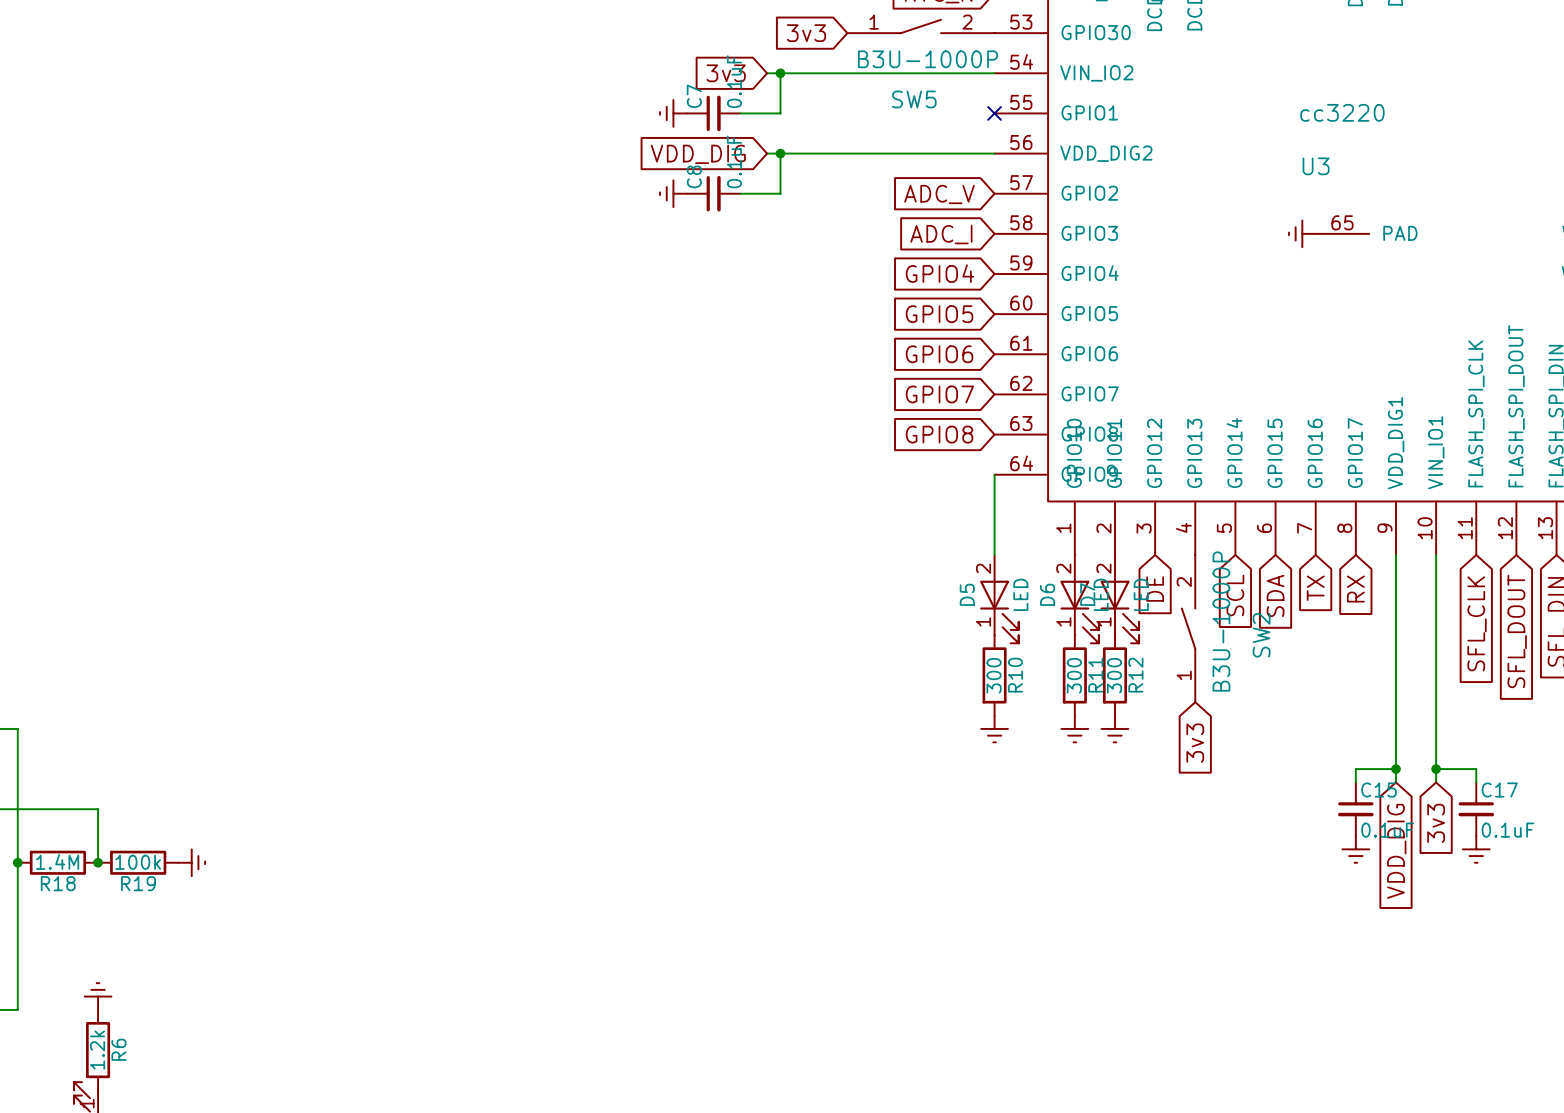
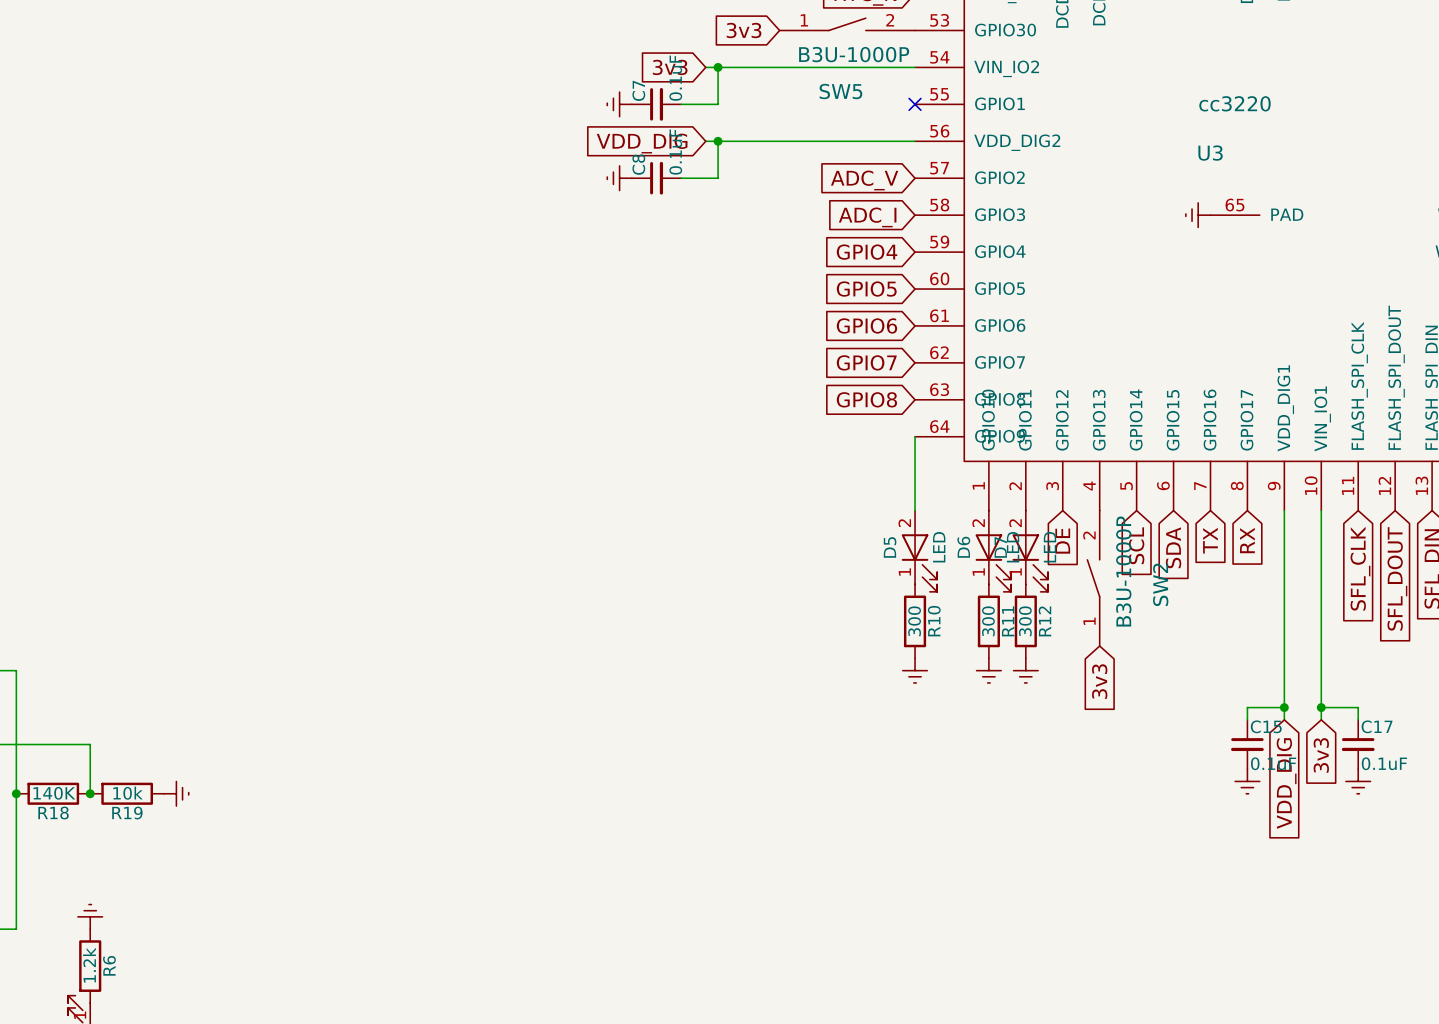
R18 value: 1.4M (57, 861) -> 140K (54, 793)
R19 value: 100k (138, 862) -> 10k (128, 793)

